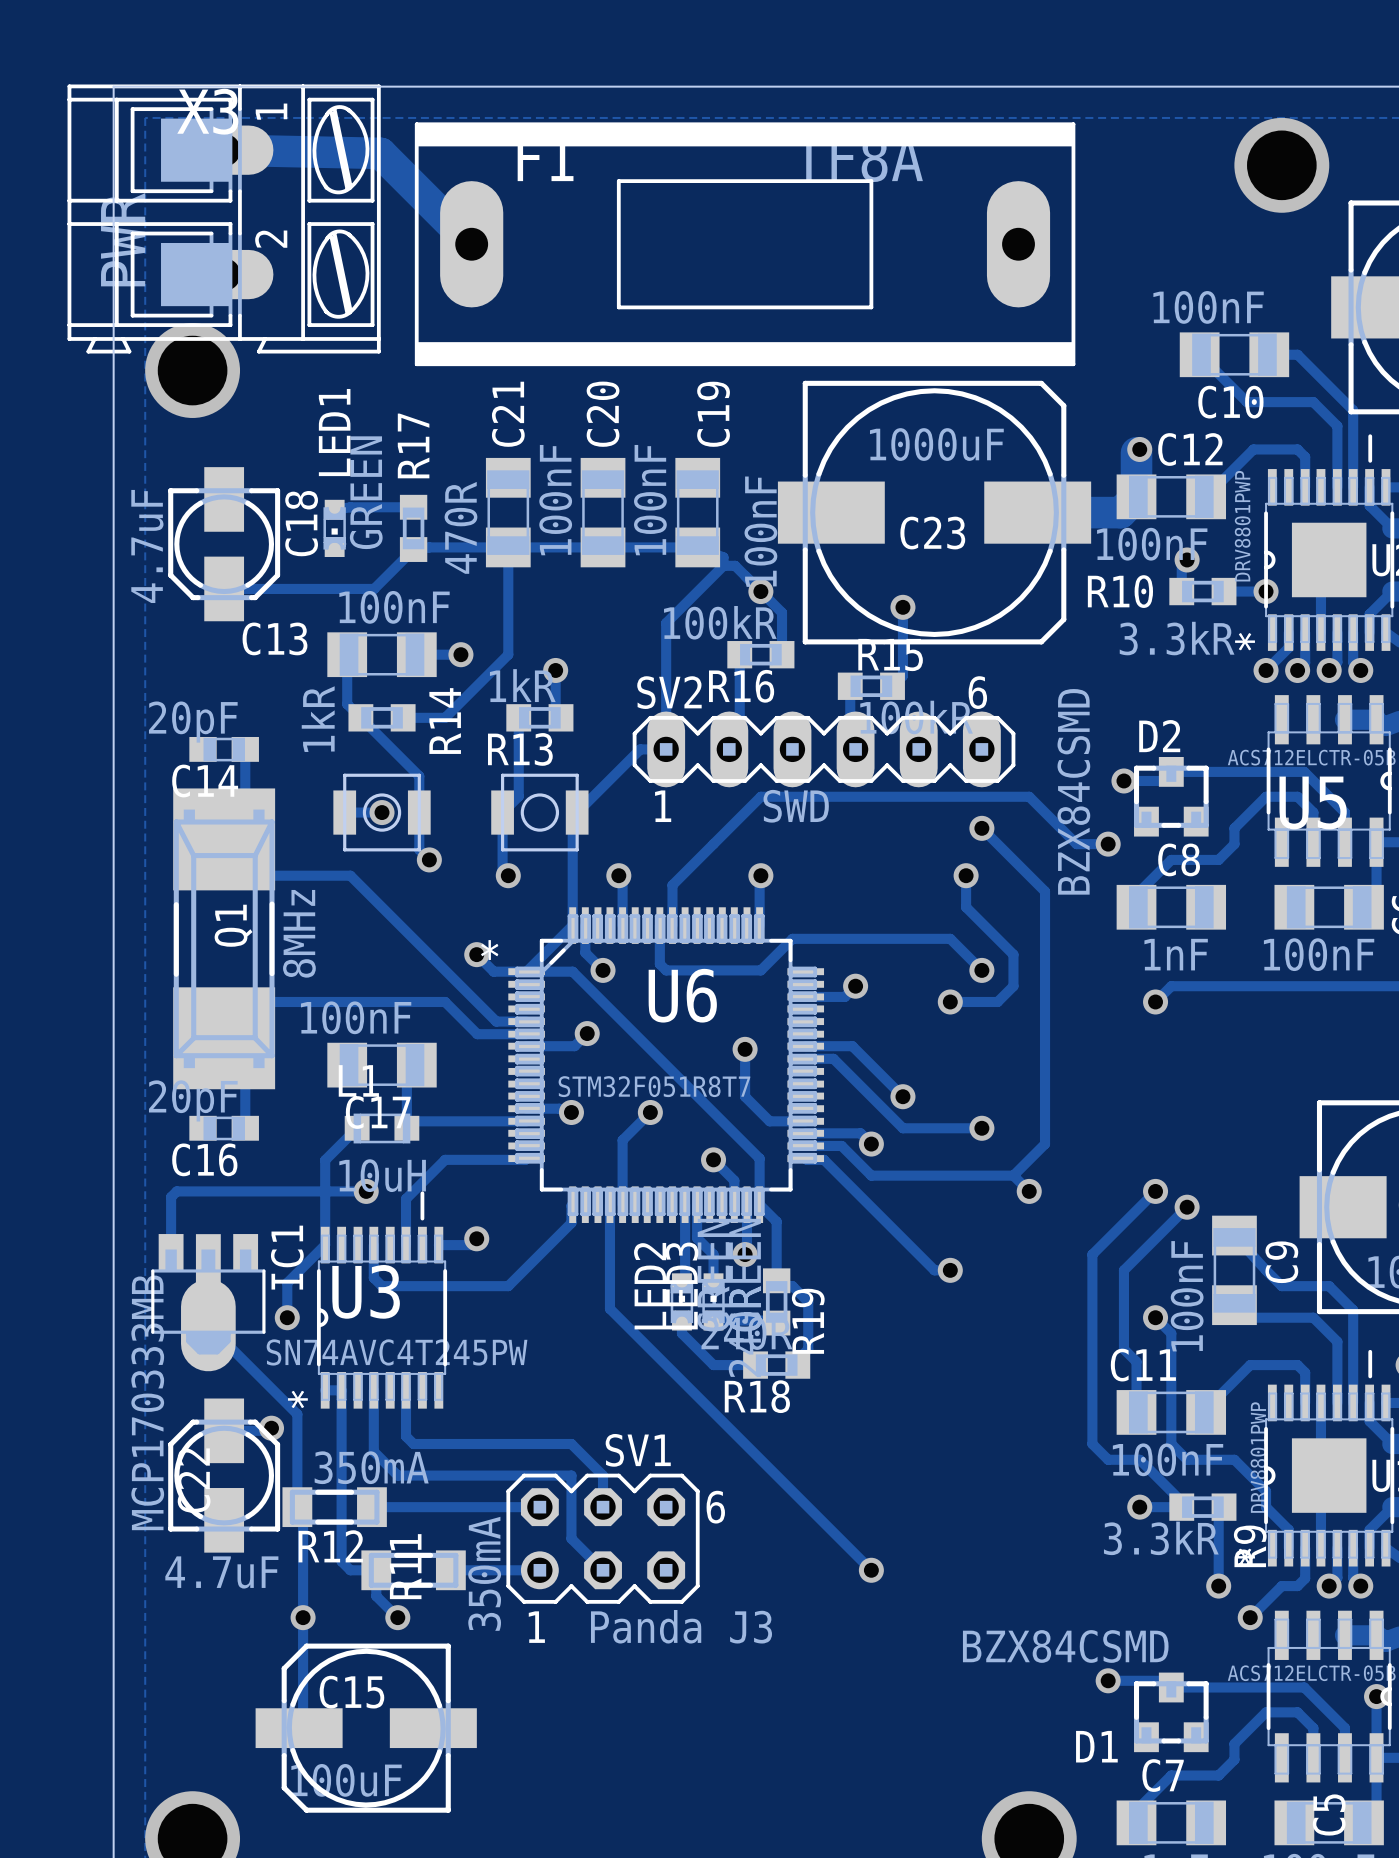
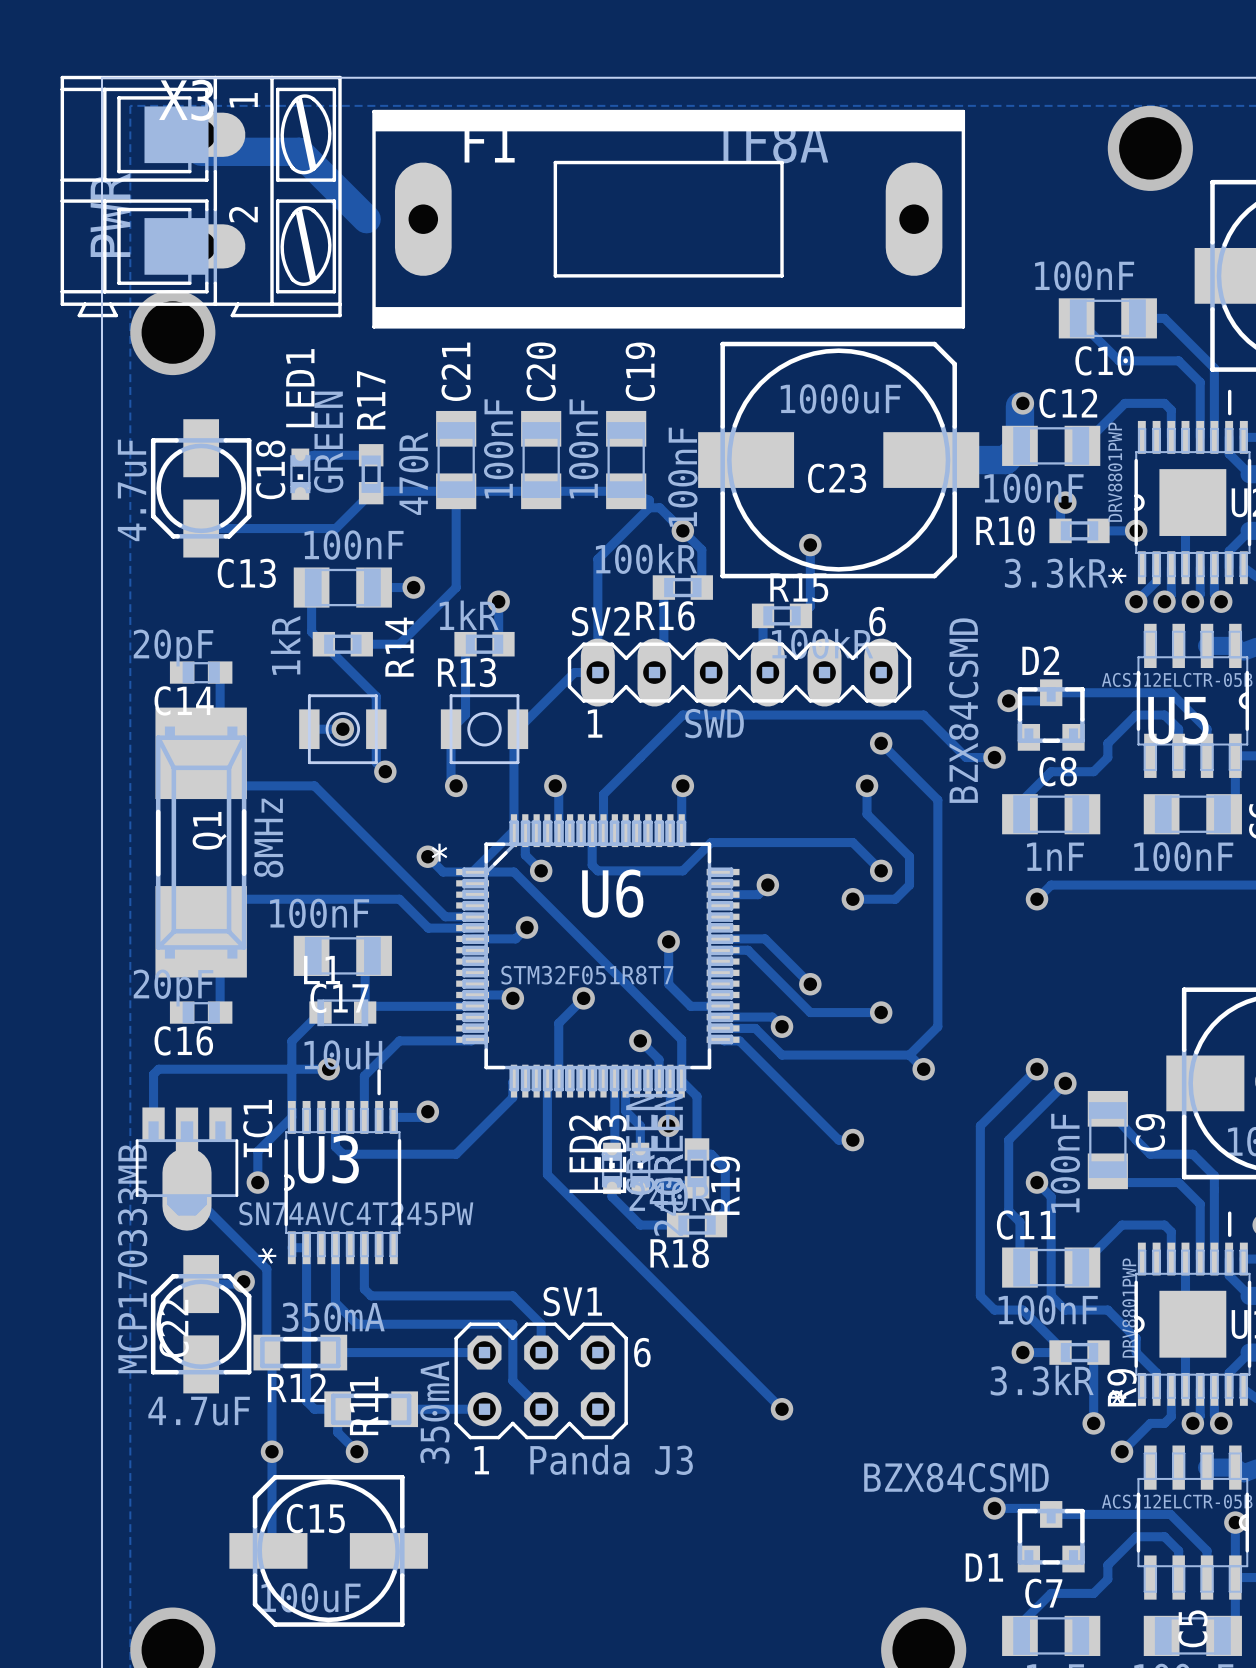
track: (224, 150) (380, 153) (471, 244) -> none
track: none -> (201, 151) (299, 151) (366, 219)

